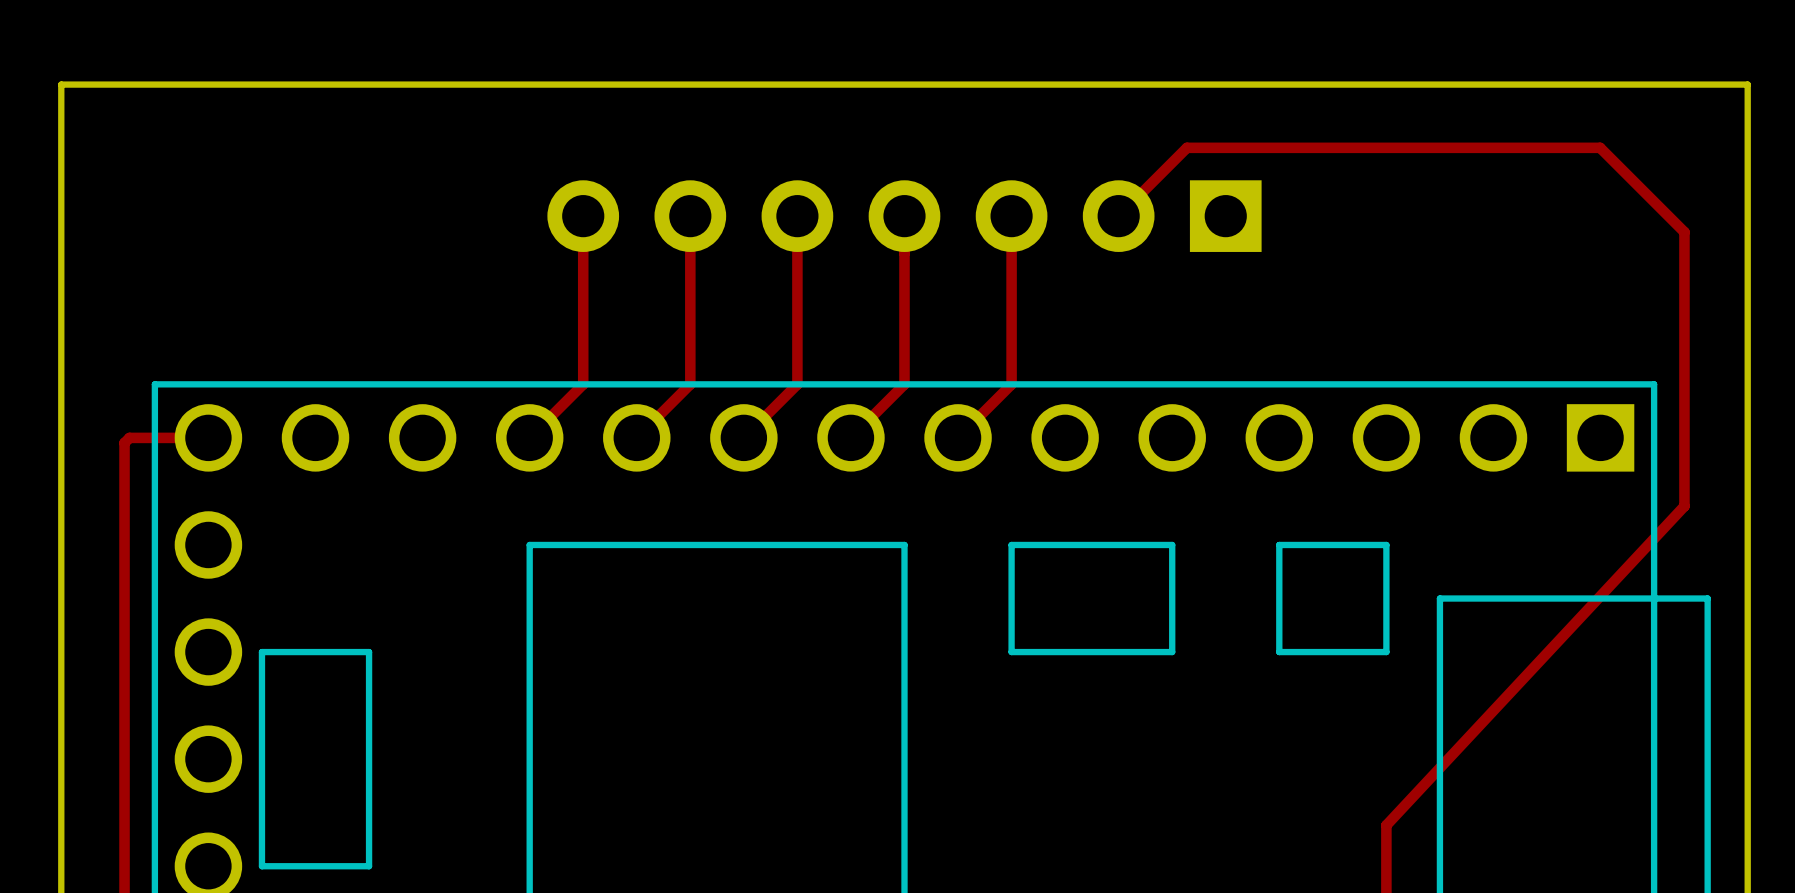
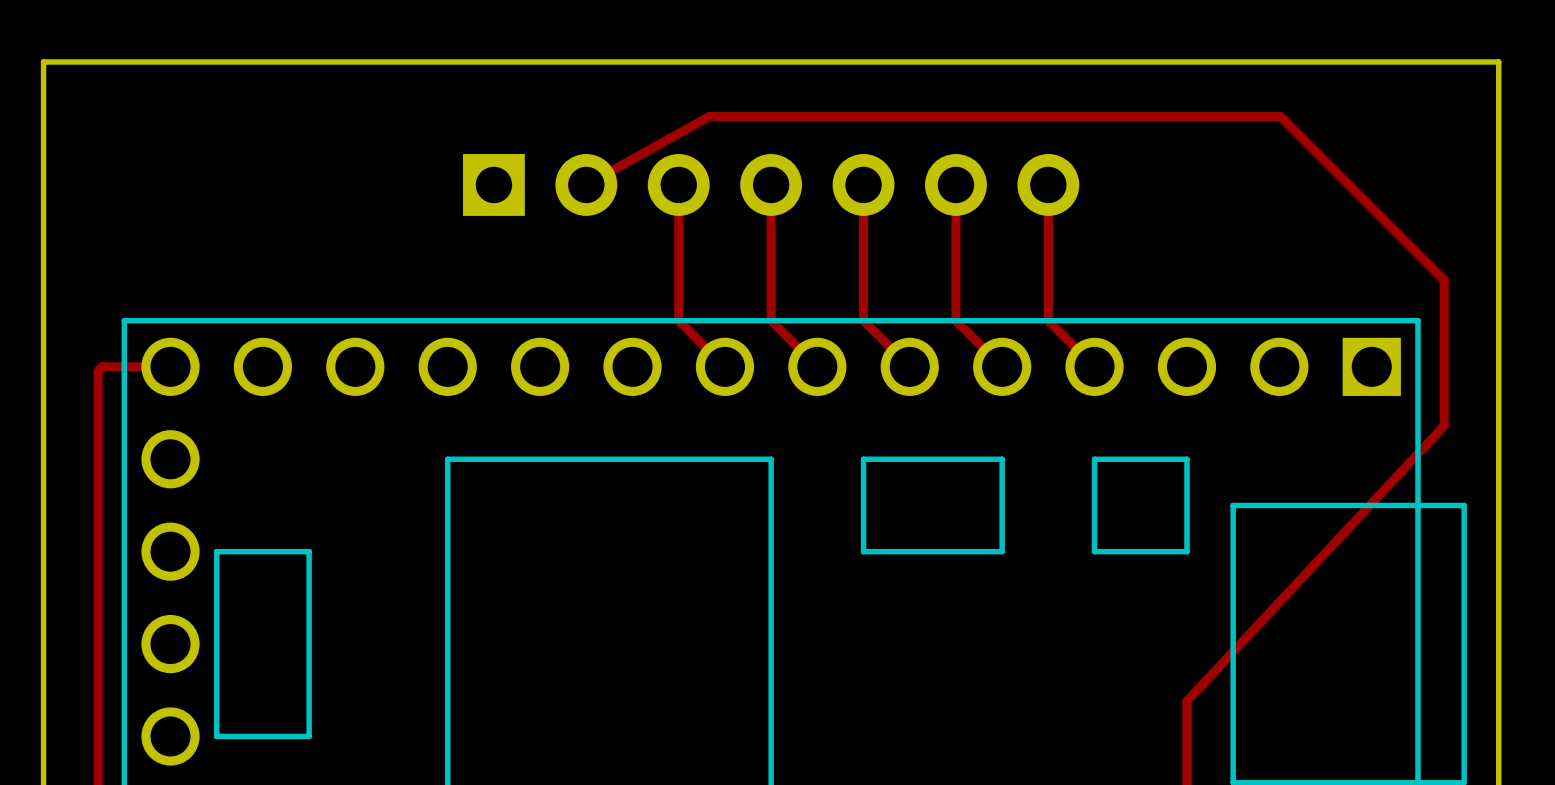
top track: (1186, 147) (1118, 216) -> (1014, 116) (709, 116) (586, 184)
top track: (1494, 147) (1600, 147) (1684, 232) (1684, 337) -> (1280, 116) (1444, 280)
top track: (583, 216) (583, 384) (529, 437) -> none
top track: (690, 216) (690, 384) (636, 437) -> none
part rotation: 0° (904, 216) -> 180° (771, 184)
top track: none -> (955, 184) (955, 320) (1002, 366)
top track: none -> (1048, 184) (1048, 320) (1094, 366)
top track: (797, 384) (743, 437) -> (678, 320) (724, 366)
top track: (904, 384) (850, 437) -> (771, 320) (817, 366)
top track: (1011, 384) (958, 437) -> (863, 320) (909, 366)

